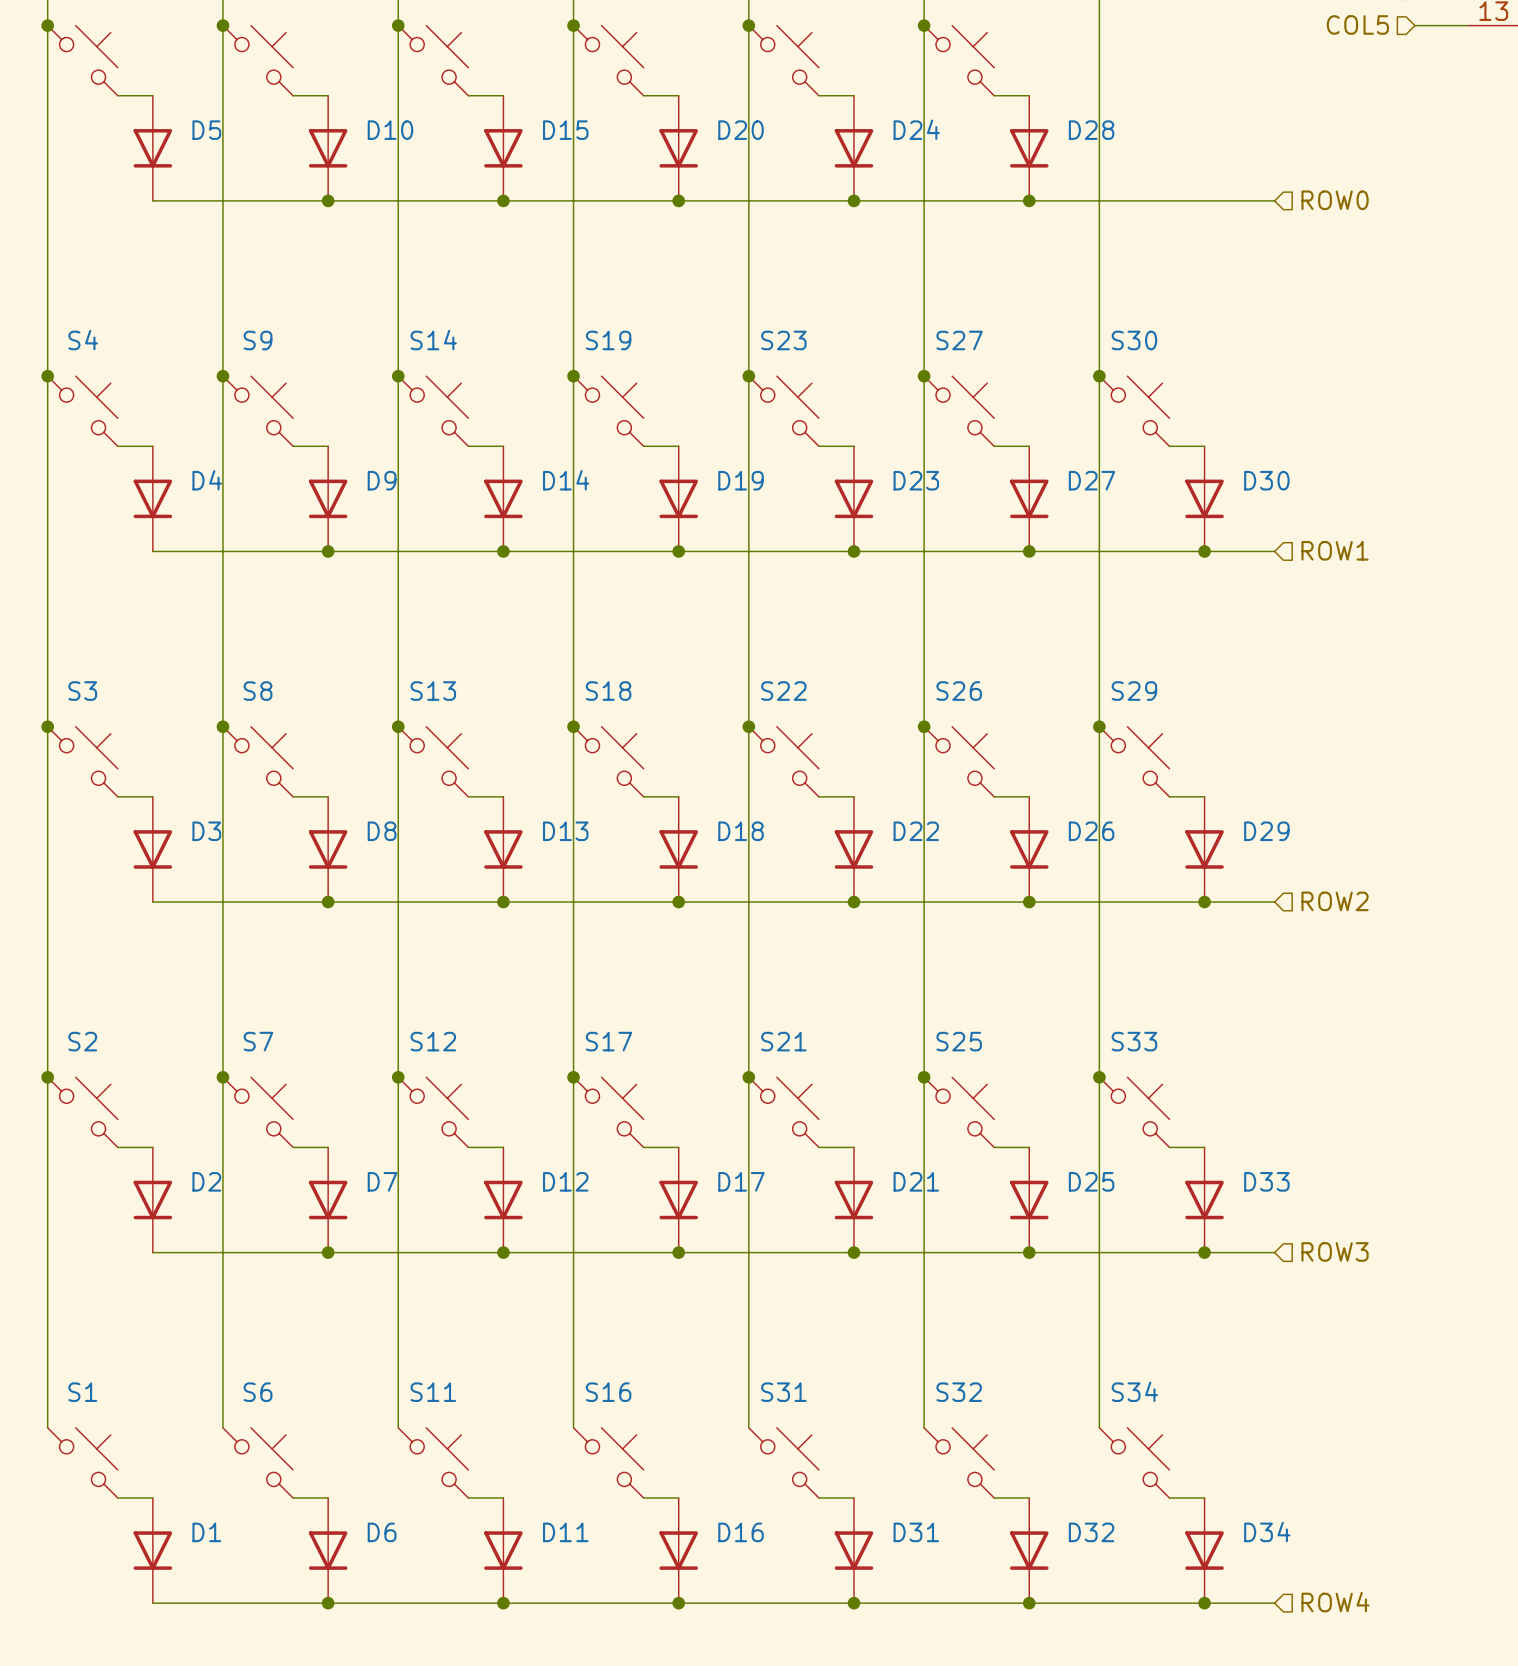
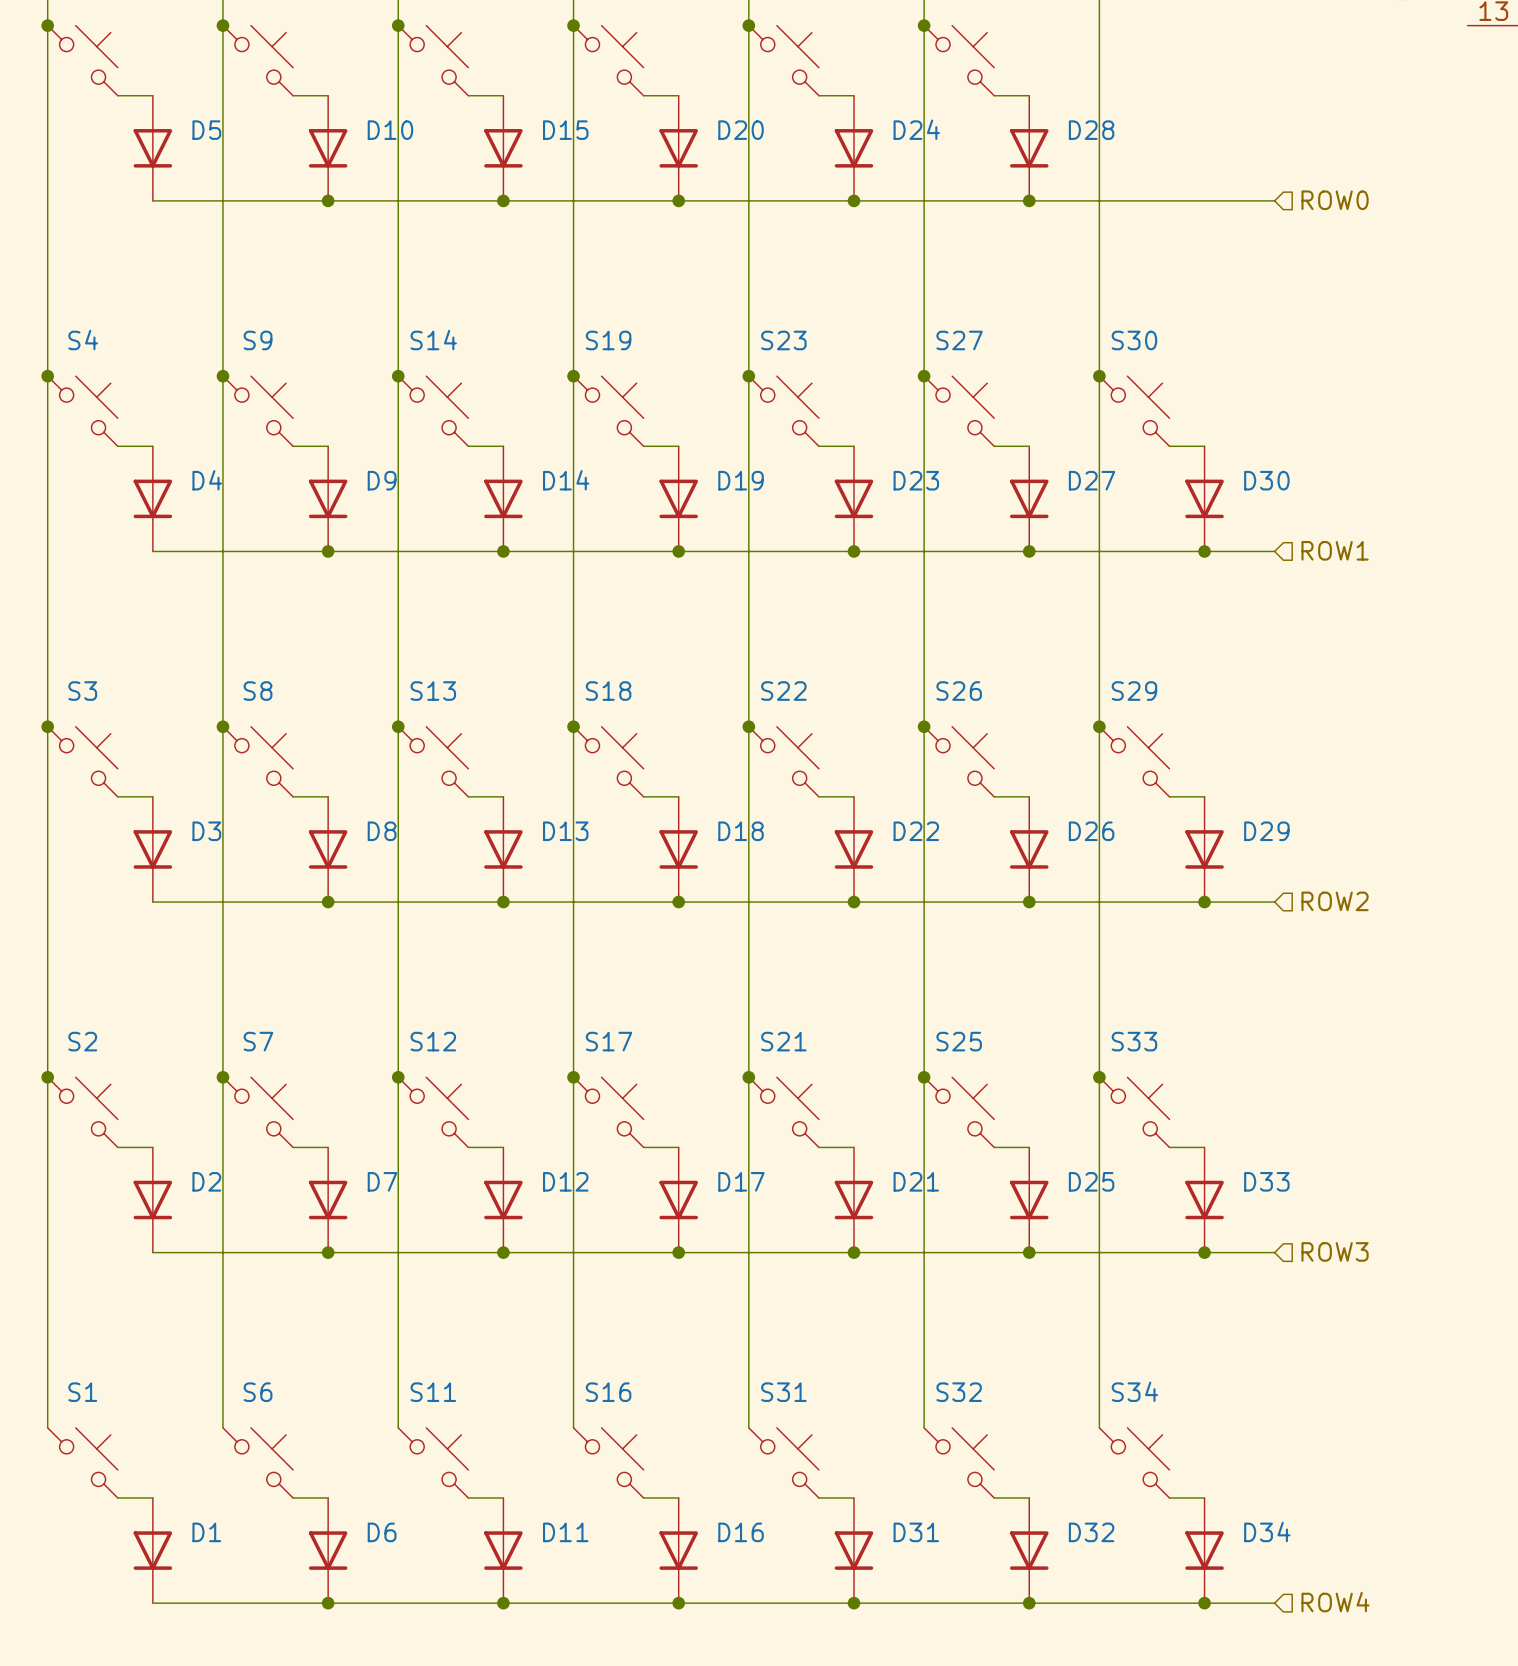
hierarchical label: COL5 (1357, 24) -> none
wire: (1414, 25) (1467, 25) -> none

